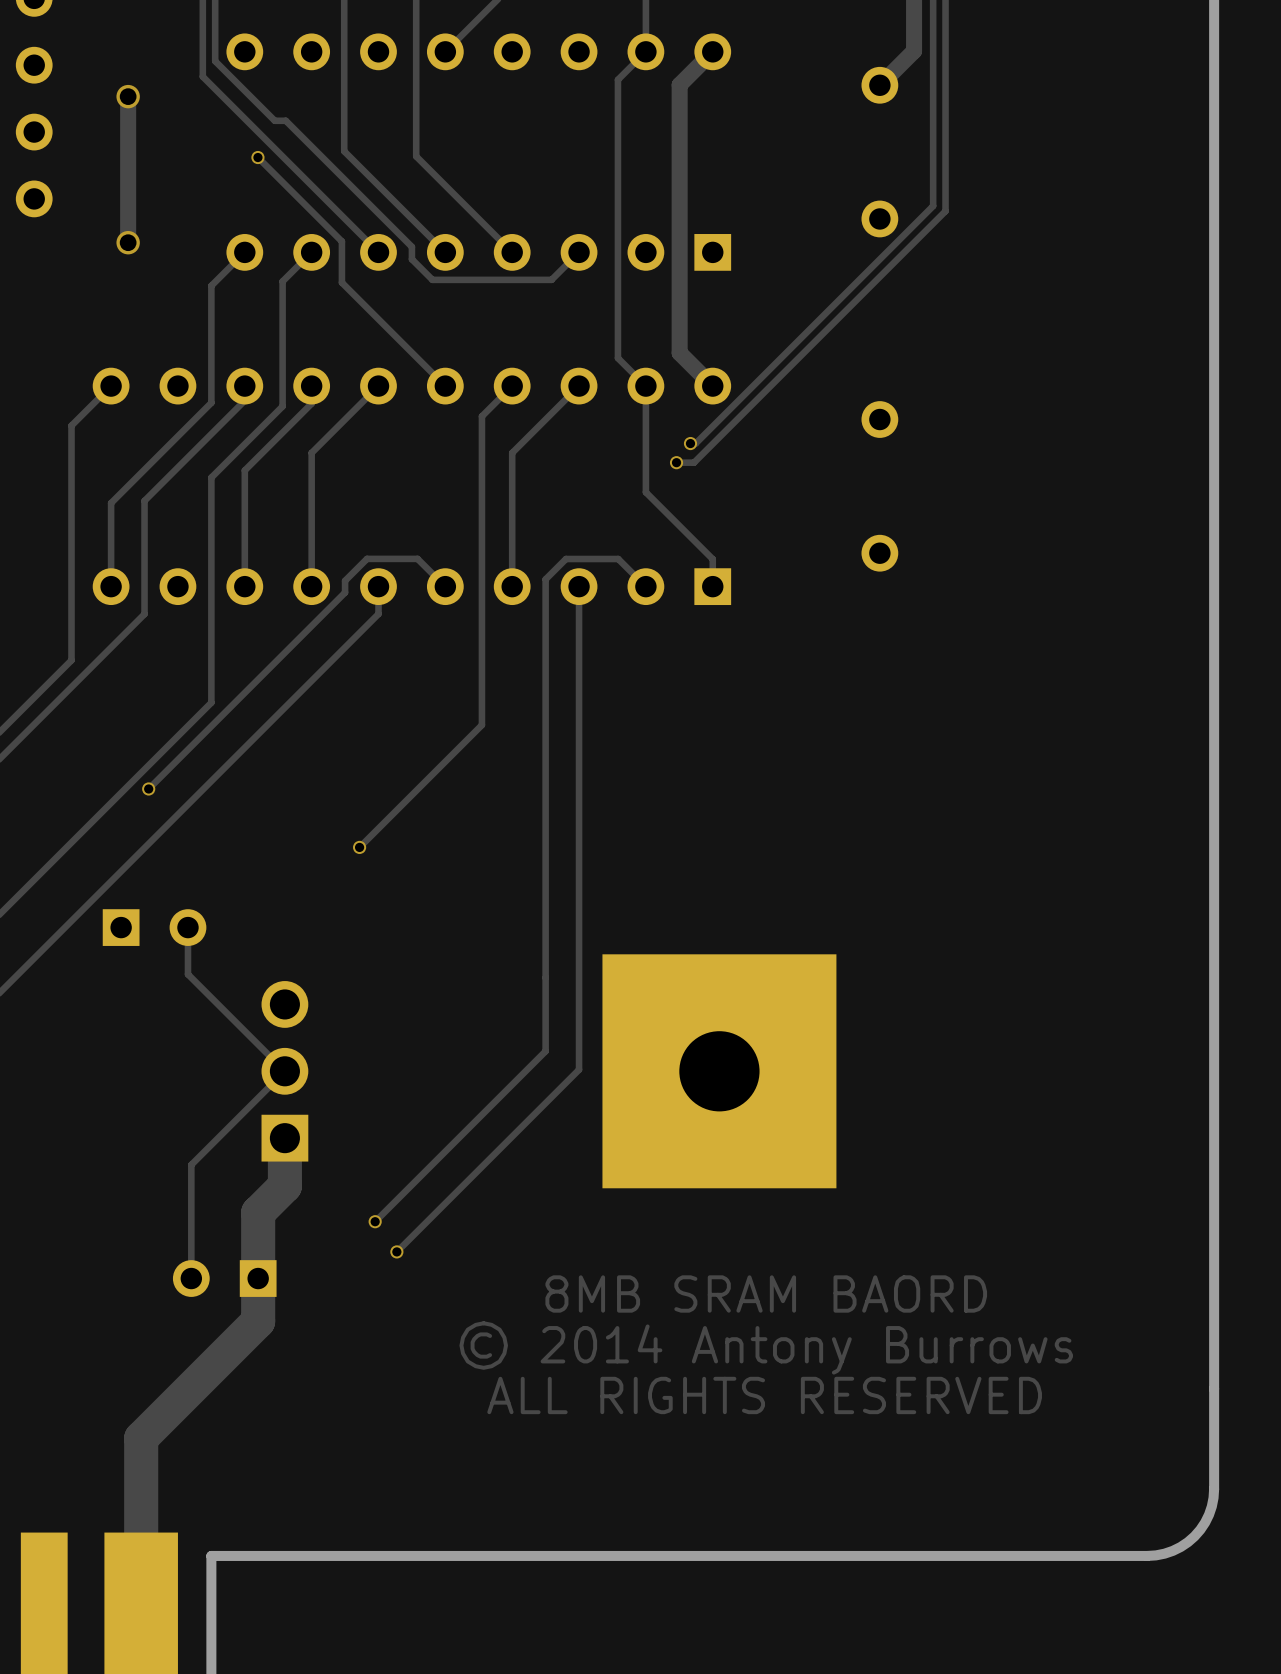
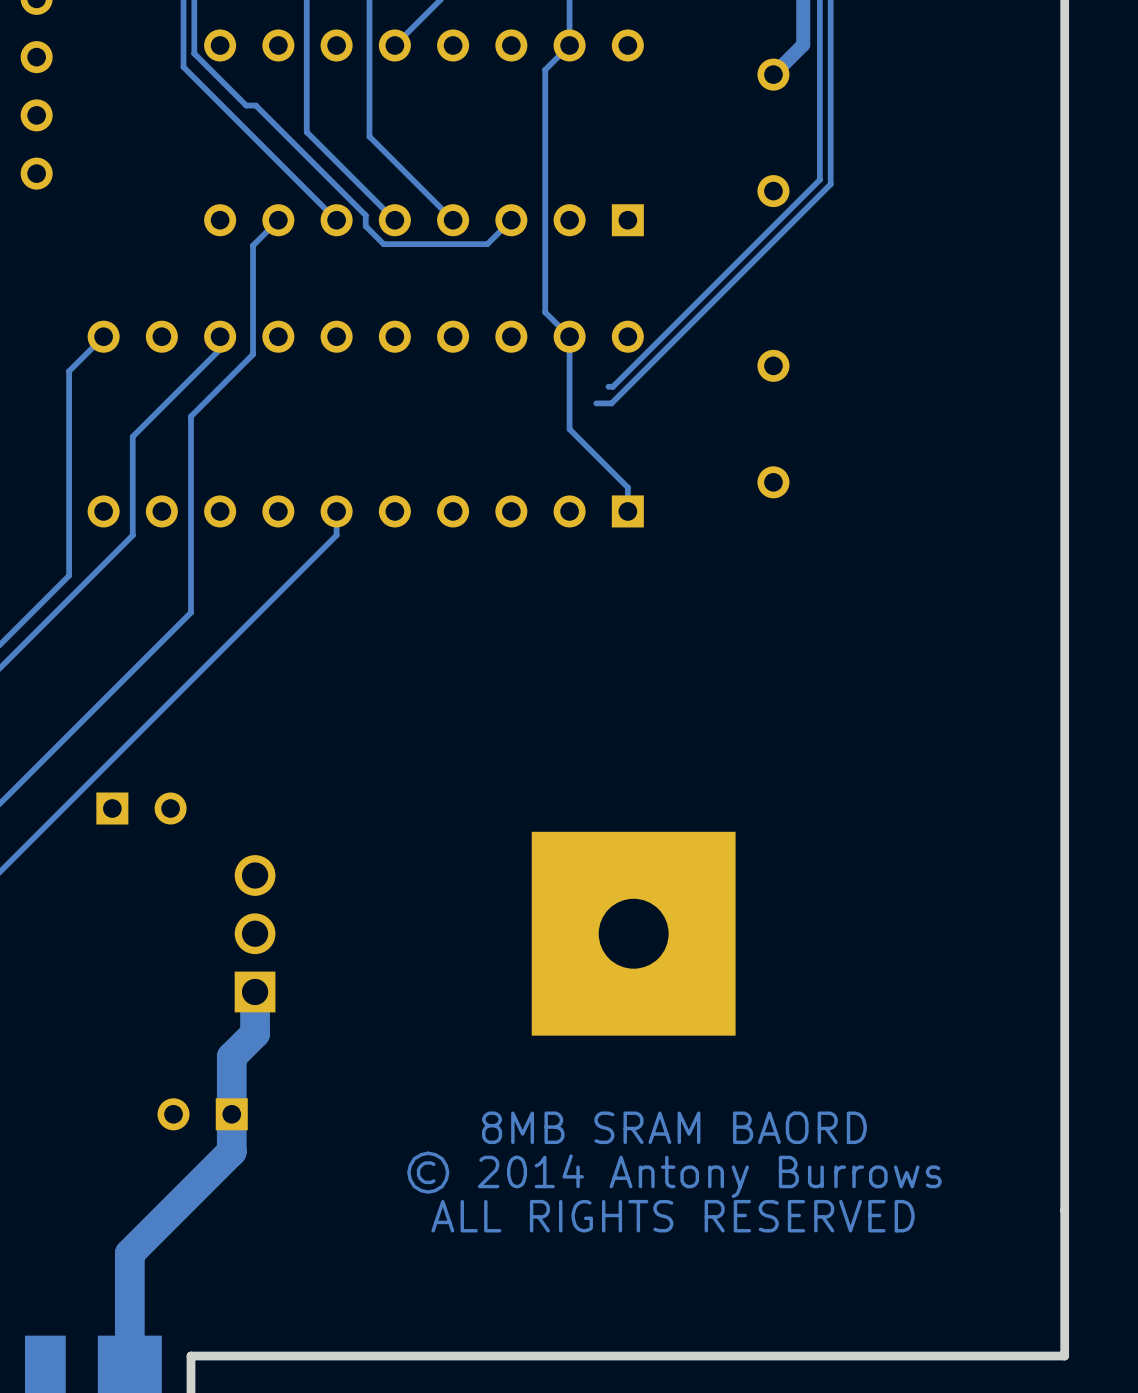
track: (712, 51) (679, 84) (679, 352) (712, 386) -> none
track: (128, 96) (128, 242) -> none
via: (128, 96) -> none
track: (257, 157) (341, 241) (341, 282) (445, 386) -> none
via: (257, 157) -> none
via: (128, 242) -> none
track: (244, 252) (211, 285) (211, 402) (111, 503) (111, 586) -> none
track: (311, 386) (311, 403) (244, 470) (244, 586) -> none
track: (378, 386) (311, 452) (311, 586) -> none
track: (512, 386) (481, 416) (481, 725) (359, 847) -> none
track: (579, 386) (512, 452) (512, 586) -> none
via: (690, 443) -> none
via: (676, 462) -> none
track: (445, 586) (417, 558) (367, 558) (345, 580) (345, 592) (148, 788) -> none
track: (579, 586) (579, 1069) (396, 1251) -> none
track: (645, 586) (618, 558) (566, 558) (545, 579) (545, 1051) (375, 1221) -> none
via: (148, 788) -> none
via: (359, 847) -> none
track: (187, 927) (187, 974) (284, 1071) (191, 1164) (191, 1278) -> none
via: (375, 1221) -> none
via: (396, 1251) -> none
board edge: (1214, 1489) (1209, 1514) (1194, 1536) (1172, 1550) (1147, 1555) -> (1064, 1297) (1064, 1356) (1006, 1356)

